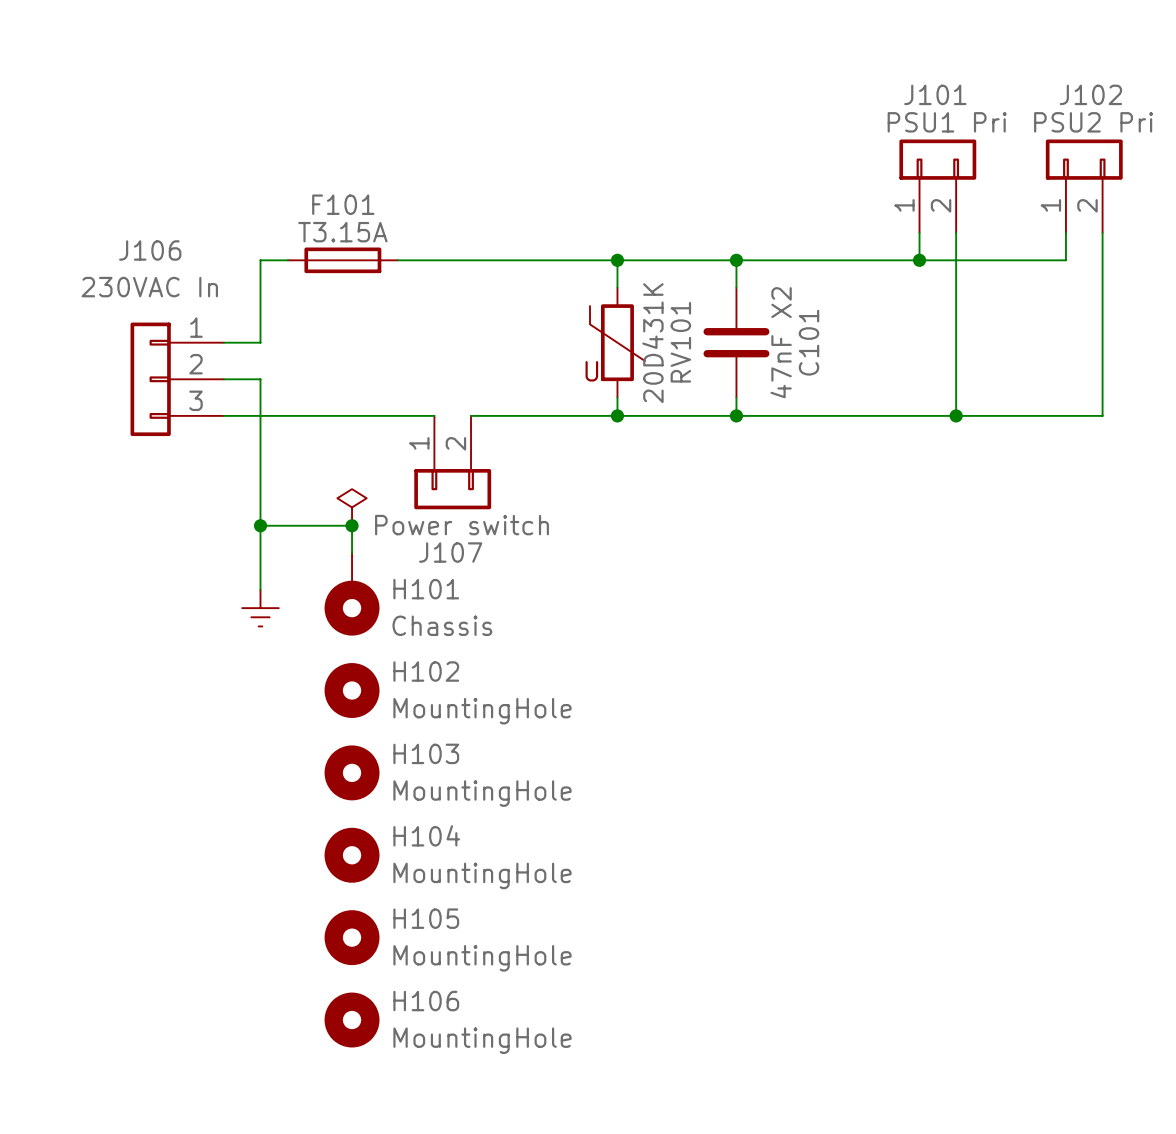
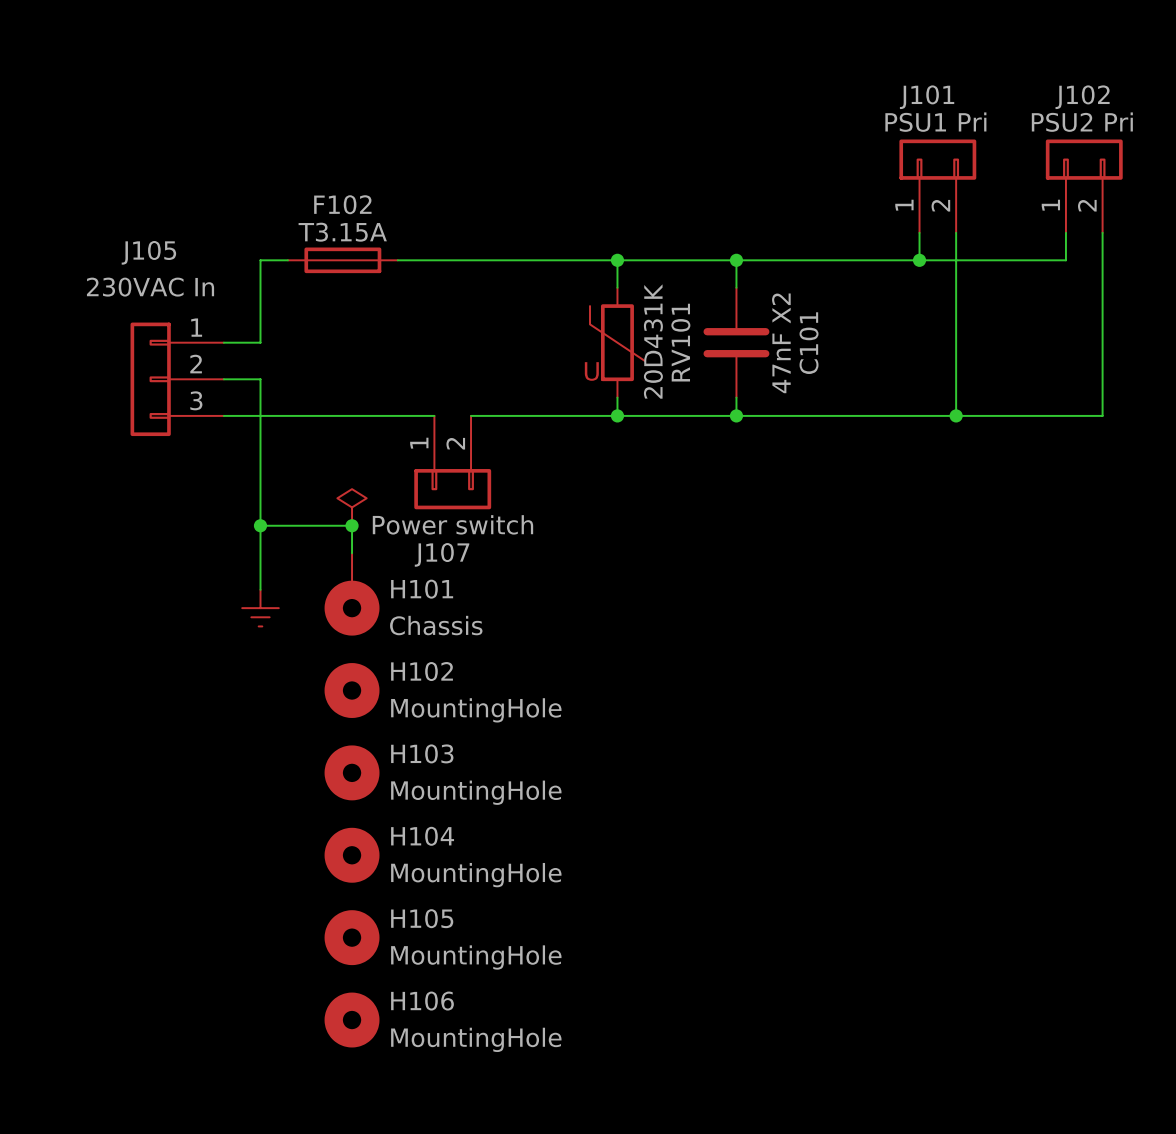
F101 name: F101 (343, 204) -> F102 (342, 204)
J106 name: J106 (150, 250) -> J105 (148, 252)

